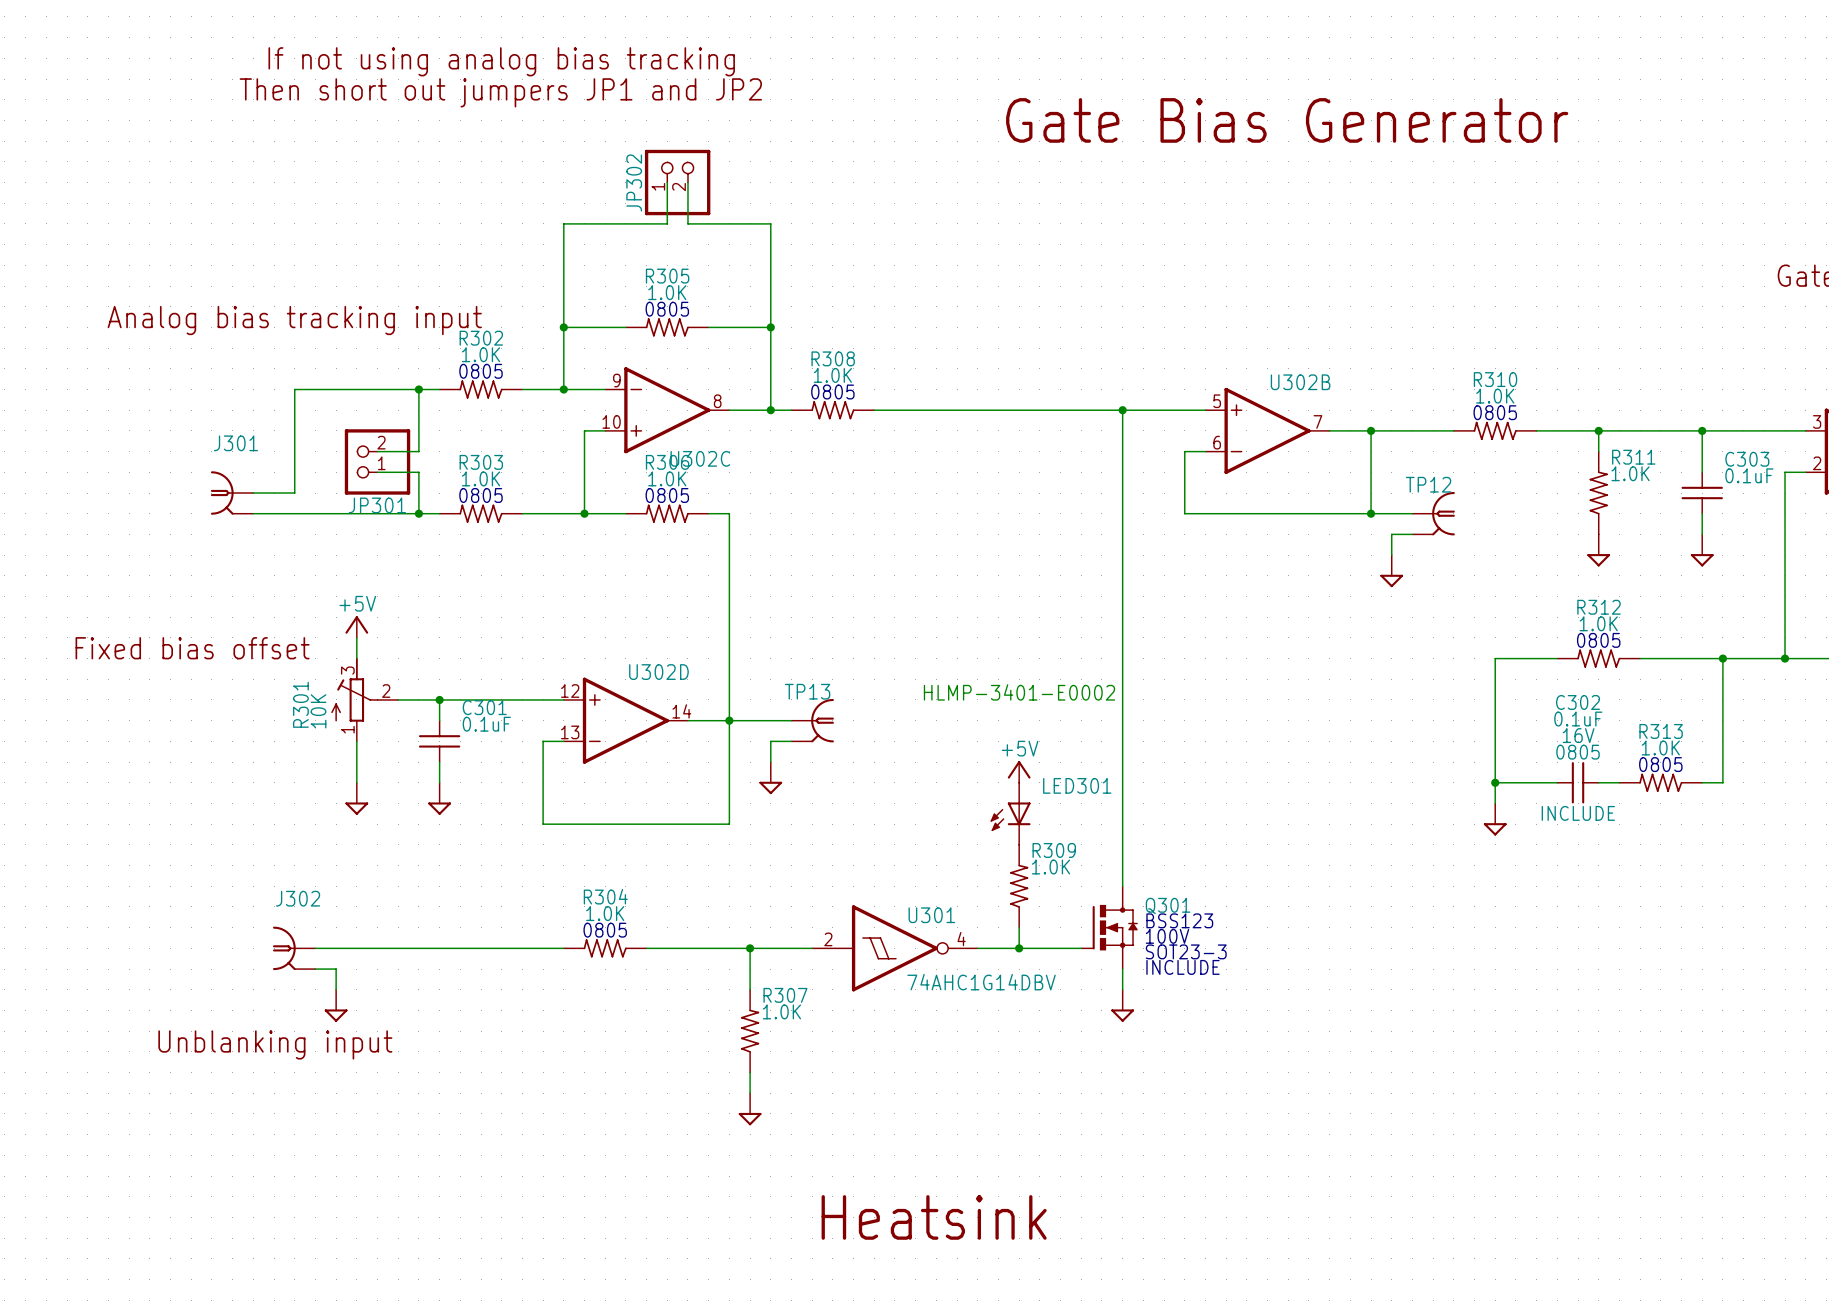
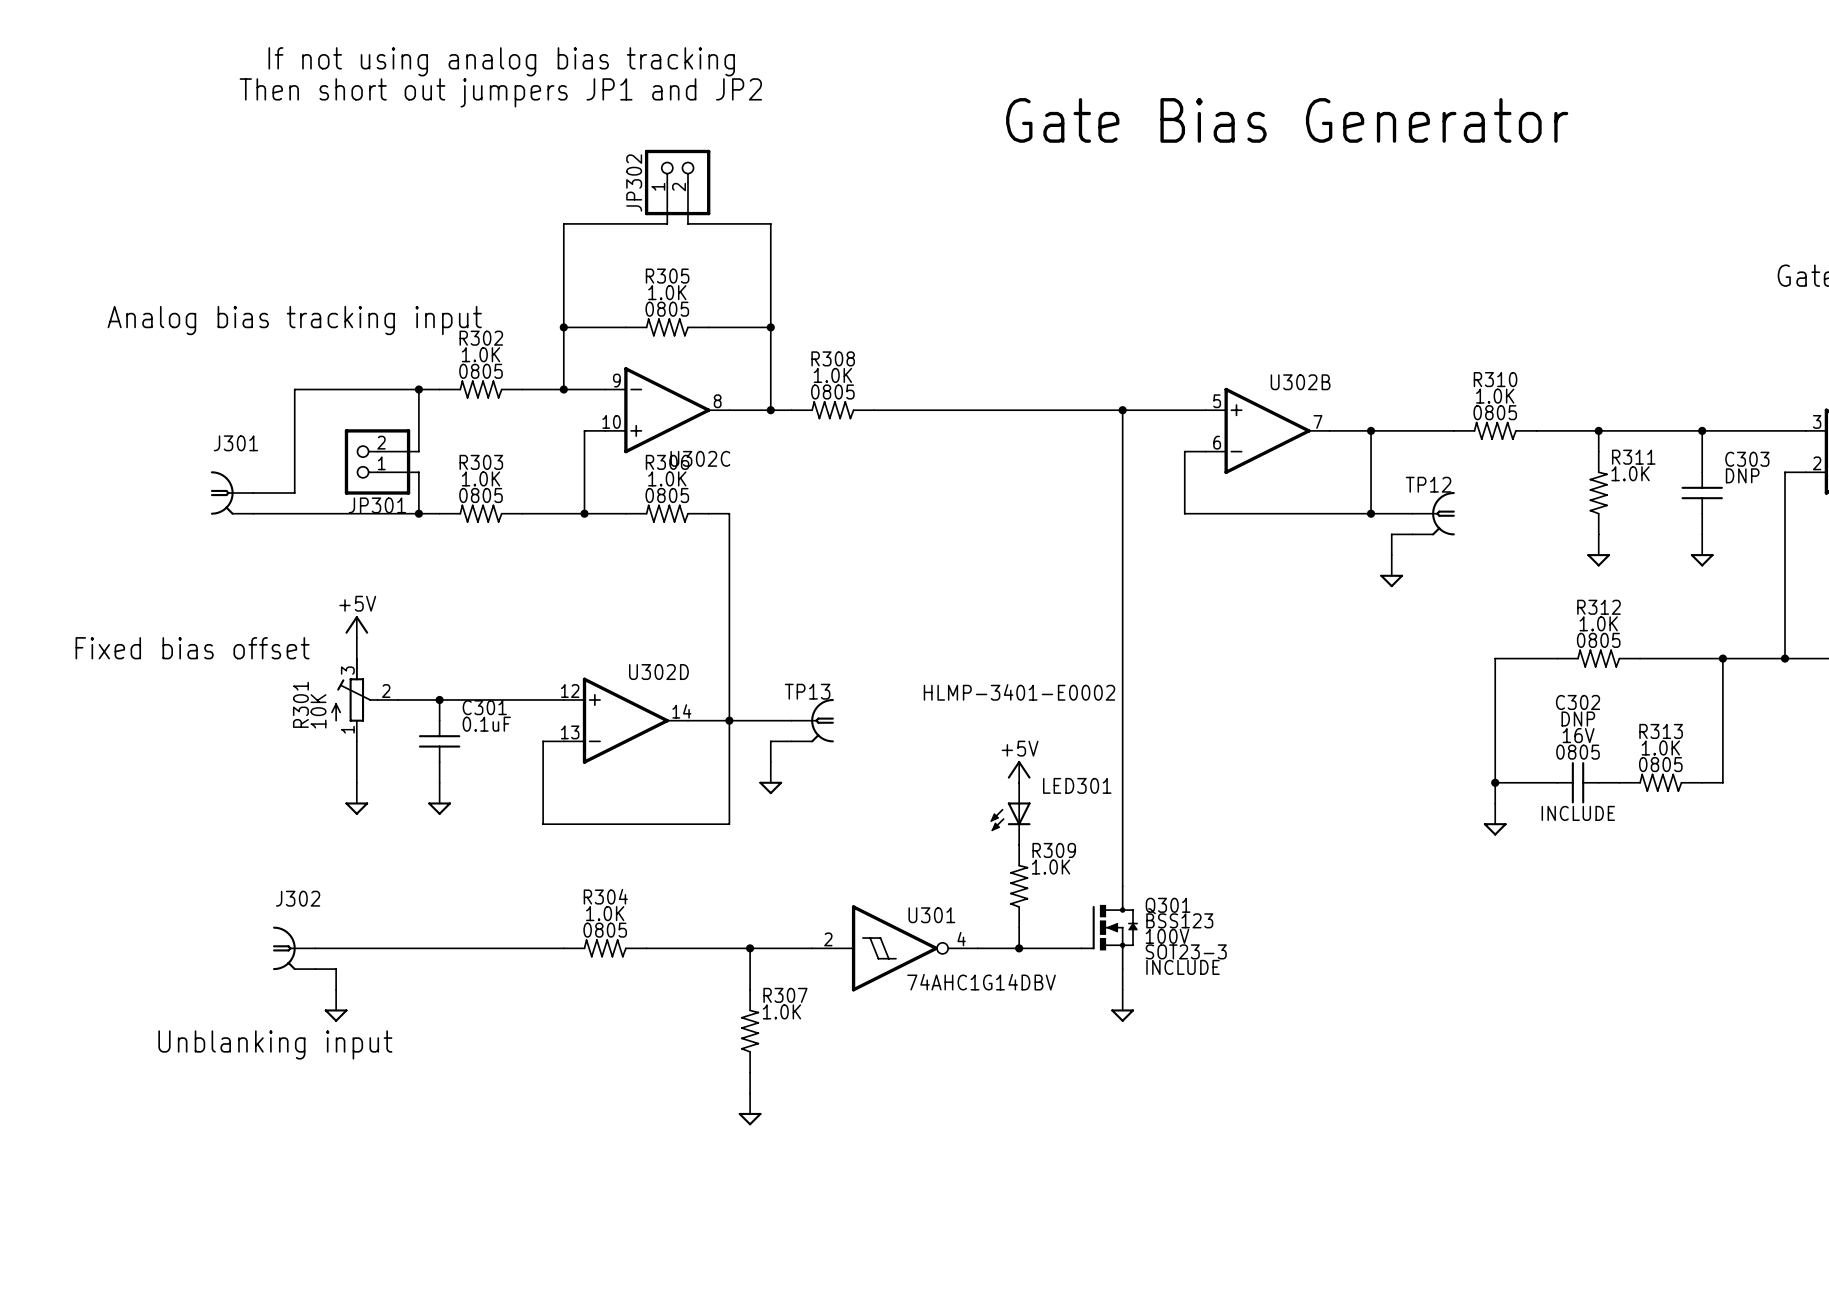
C303 value: 0.1uF (1749, 475) -> DNP (1742, 475)
C302 value: 0.1uF (1578, 719) -> DNP (1578, 719)
text: Heatsink (934, 1217) -> none

